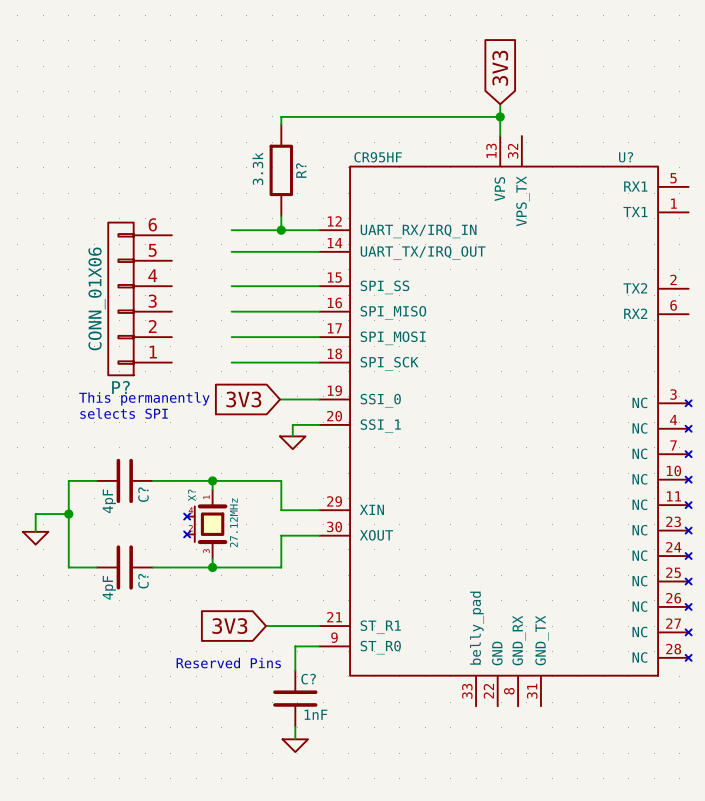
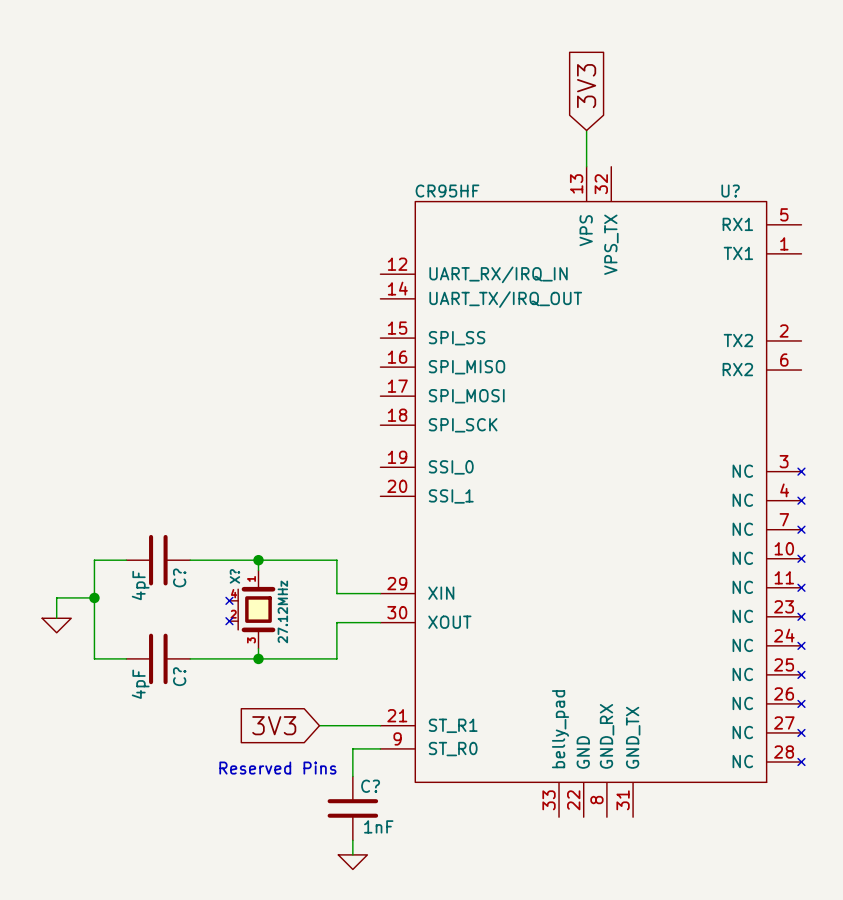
wire: (500, 116) (281, 116) (281, 124) -> none
junction: (500, 116) -> none
R?: 3.3k (281, 170) -> none
wire: (281, 216) (281, 230) -> none
wire: (231, 230) (319, 230) -> none
junction: (281, 230) -> none
wire: (231, 251) (319, 251) -> none
wire: (231, 286) (319, 286) -> none
P?: CONN_01X06 (140, 298) -> none
wire: (231, 311) (319, 311) -> none
wire: (231, 337) (319, 337) -> none
wire: (231, 362) (319, 362) -> none
text: This permanently (144, 398) -> none
global label: 3V3 (243, 399) -> none
wire: (280, 399) (319, 399) -> none
text: selects SPI (124, 413) -> none
wire: (319, 424) (292, 424) (292, 436) -> none
power symbol: (292, 442) -> none

